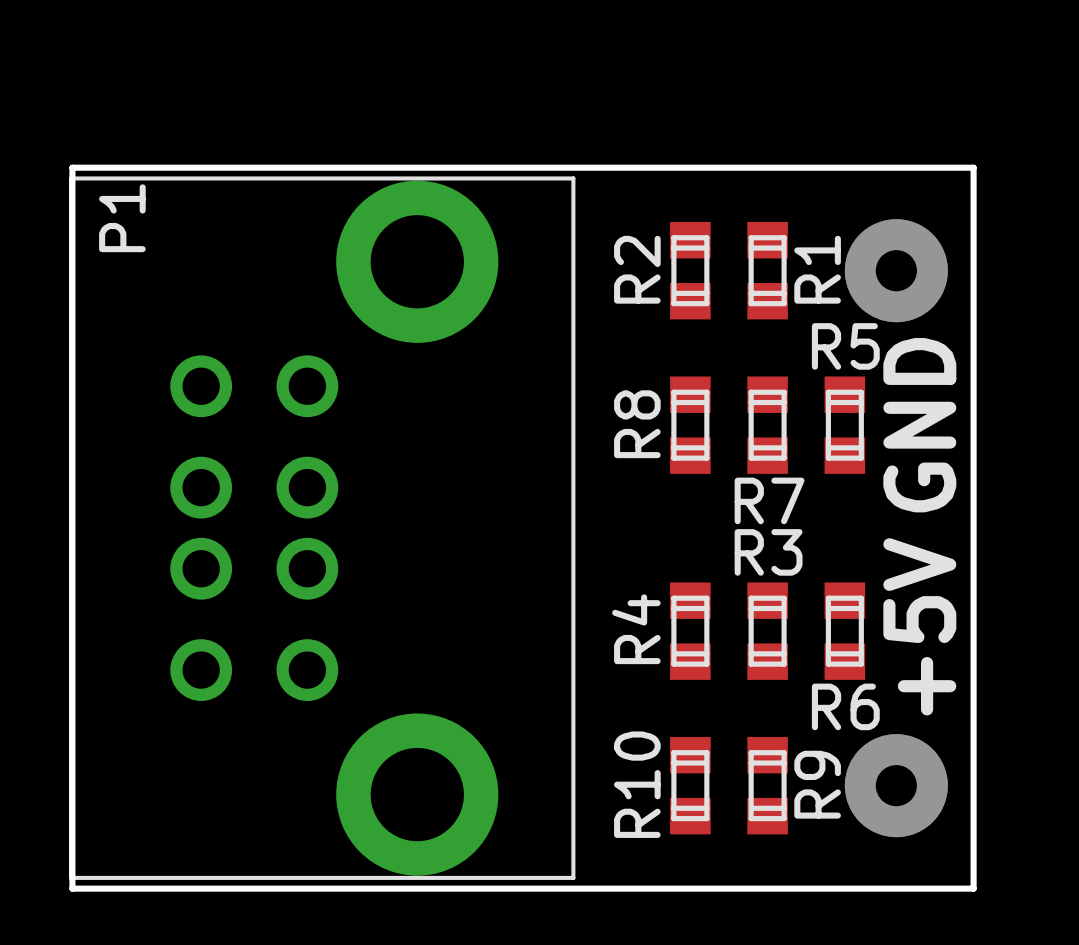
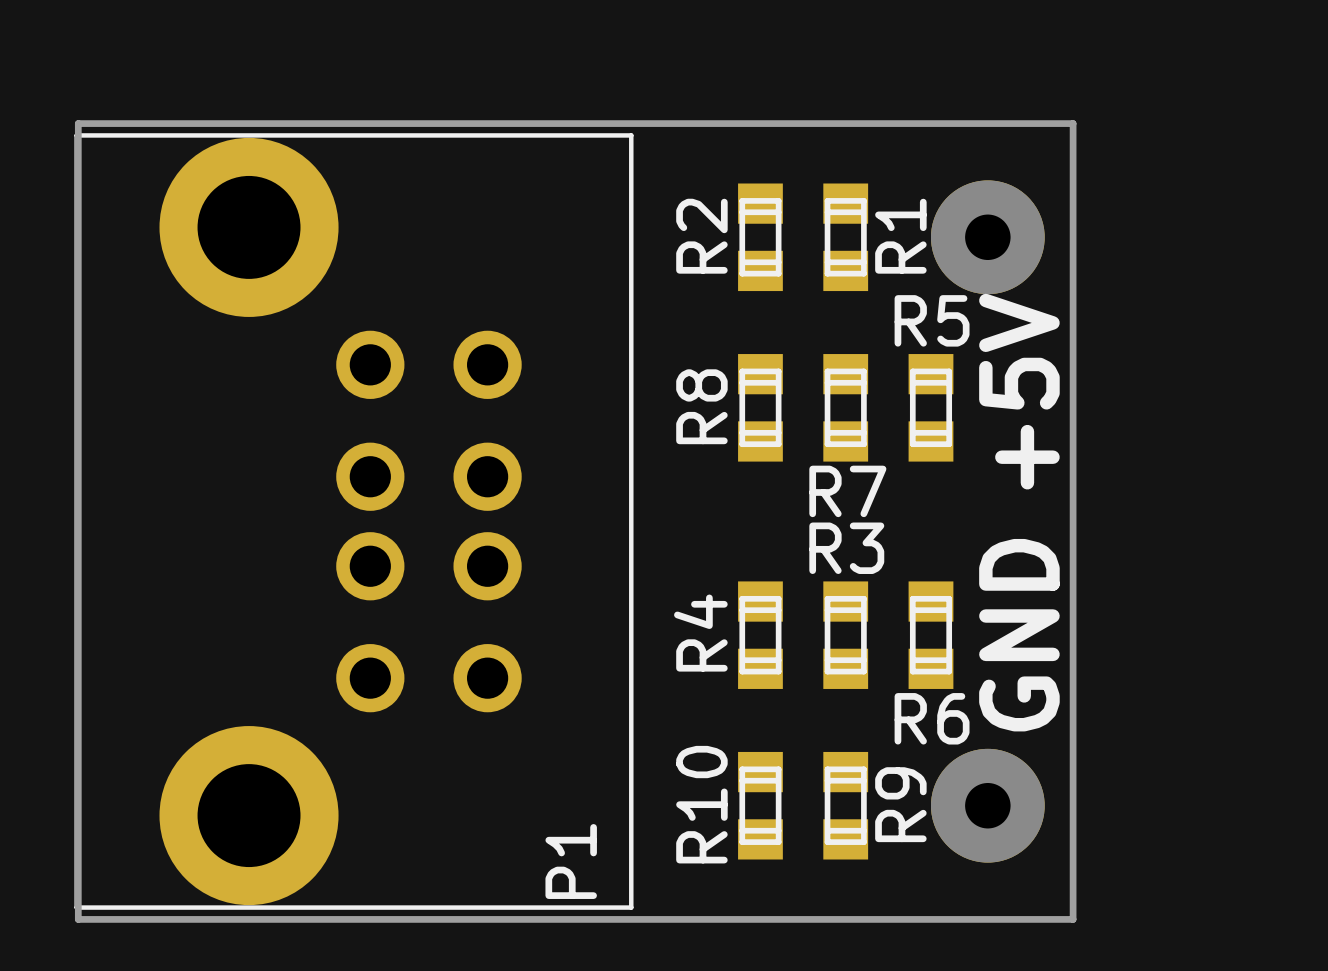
text: GND (919, 425) -> +5V (1019, 391)
P1 rotation: 0° (322, 528) -> 180° (353, 521)
text: +5V (919, 626) -> GND (1019, 635)

